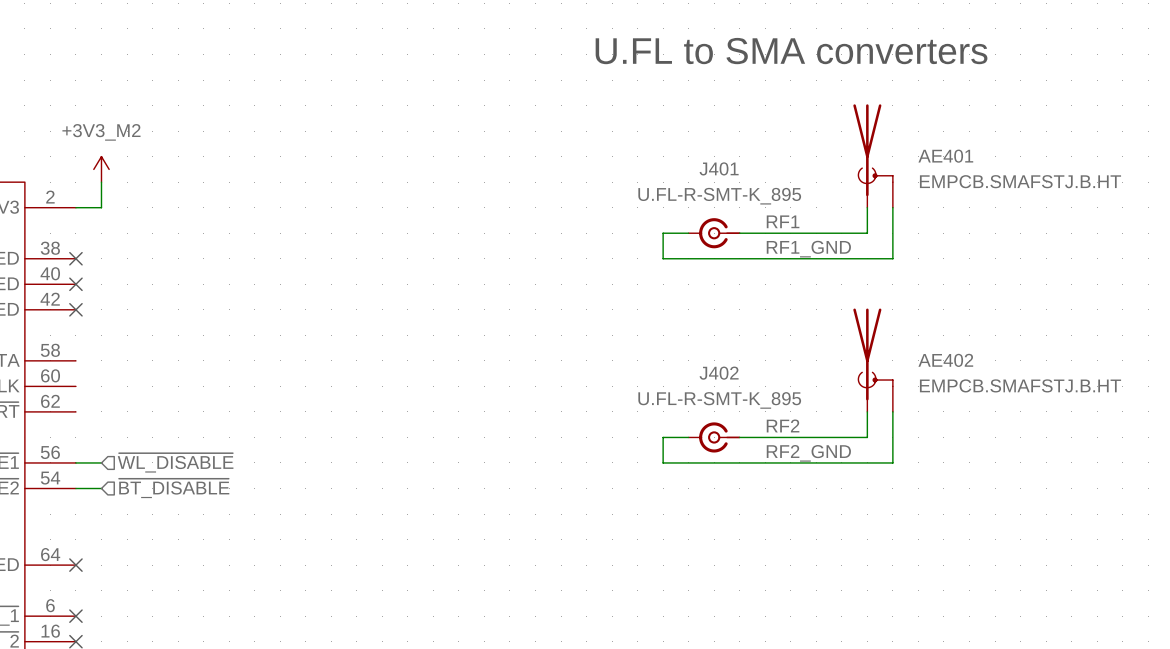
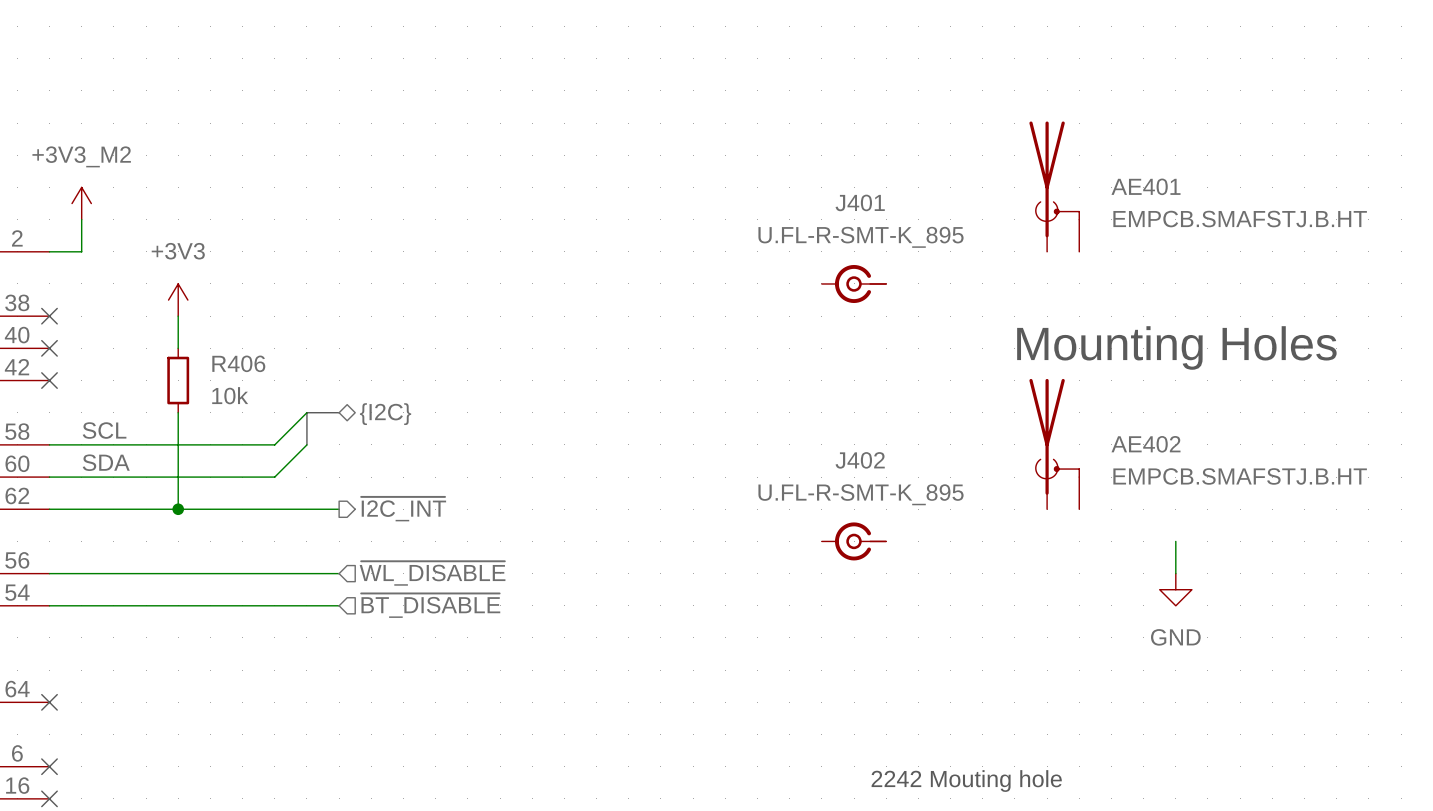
text: U.FL to SMA converters (791, 51) -> none
wire: (867, 207) (867, 233) (739, 233) -> none
wire: (892, 207) (892, 258) (663, 258) (663, 233) (688, 233) -> none
label: RF1 (783, 221) -> none
power symbol: none -> +3V3 (178, 300)
label: RF1_GND (808, 249) -> none
wire: none -> (178, 316) (178, 348)
text: none -> Mounting Holes (1176, 347)
R406: none -> 10k (178, 380)
wire: none -> (178, 412) (178, 509)
wire: none -> (306, 412) (274, 444) (49, 444)
bus: none -> (339, 412) (306, 412) (306, 444)
hierarchical label: none -> {I2C} (385, 414)
label: none -> SCL (104, 430)
wire: none -> (306, 444) (274, 477) (49, 477)
label: none -> SDA (106, 462)
wire: none -> (49, 509) (339, 509)
junction: none -> (178, 509)
hierarchical label: none -> ~{I2C_INT} (403, 509)
wire: (867, 411) (867, 437) (739, 437) -> none
wire: (892, 411) (892, 462) (663, 462) (663, 437) (688, 437) -> none
label: RF2 (783, 425) -> none
wire: none -> (1175, 541) (1175, 573)
label: RF2_GND (808, 453) -> none
wire: none -> (81, 573) (339, 573)
hierarchical label position: ~{WL_DISABLE} (175, 462) -> ~{WL_DISABLE} (432, 573)
power symbol: none -> GND (1175, 589)
wire: none -> (81, 605) (339, 605)
hierarchical label position: ~{BT_DISABLE} (174, 488) -> ~{BT_DISABLE} (430, 605)
text: none -> 2242 Mouting hole (966, 781)

